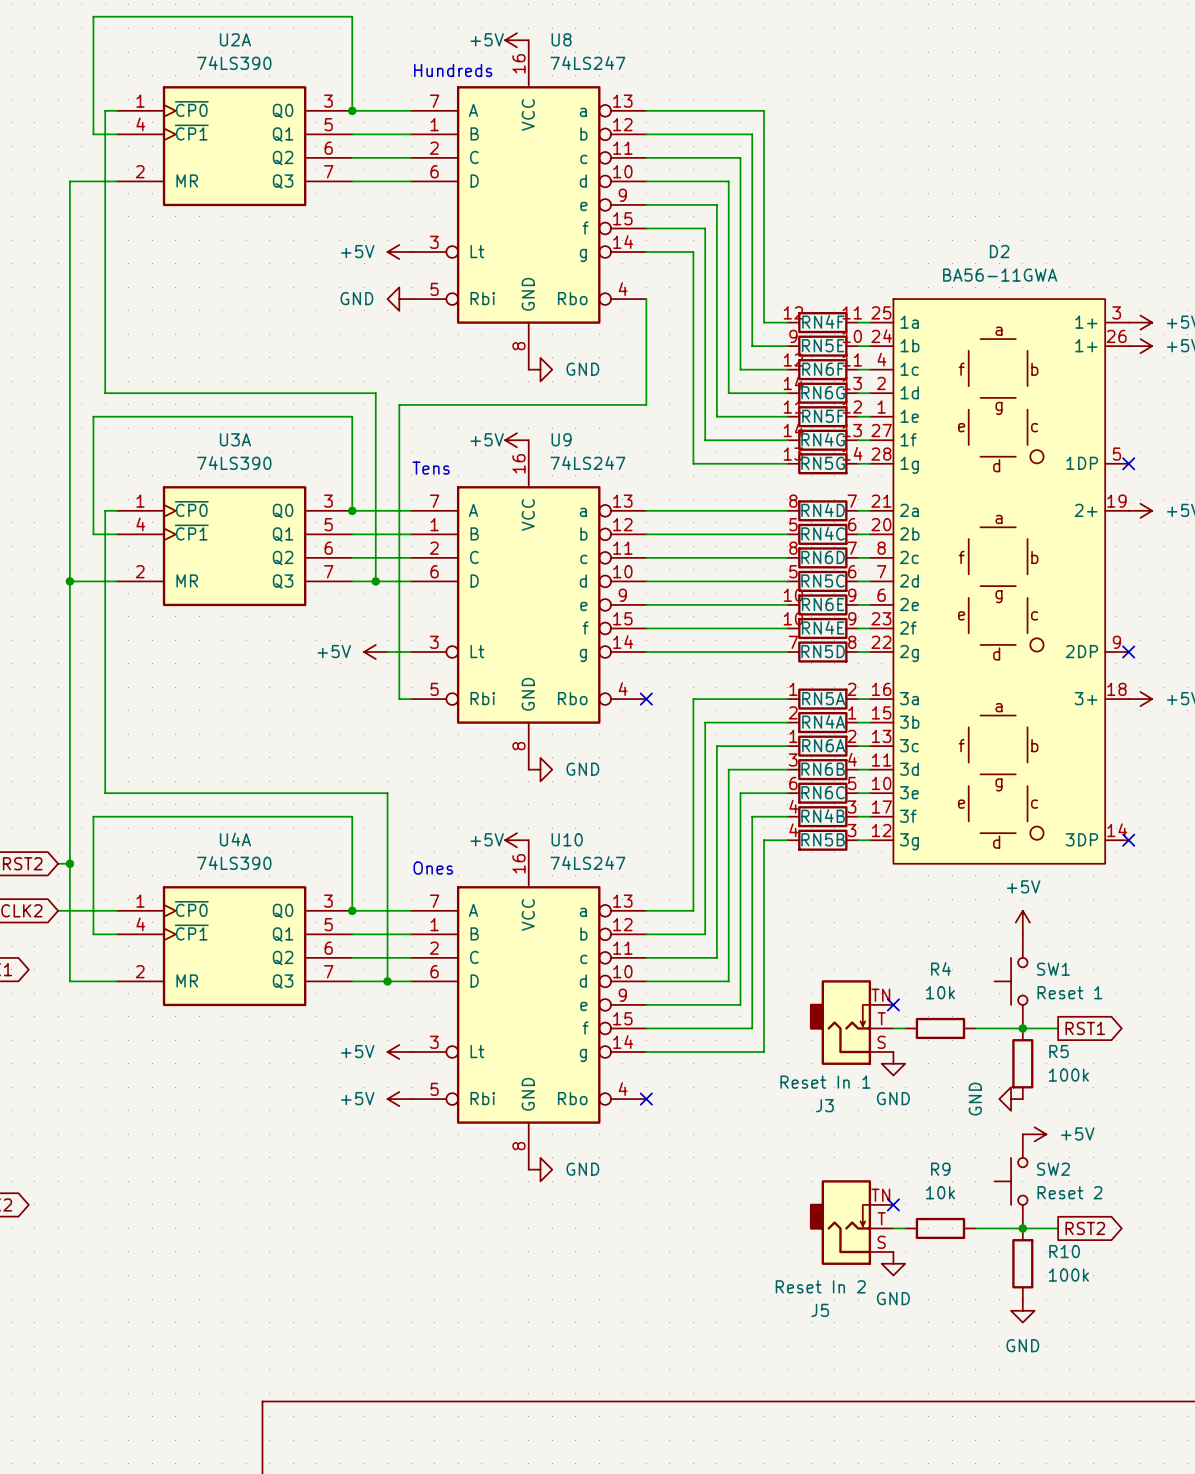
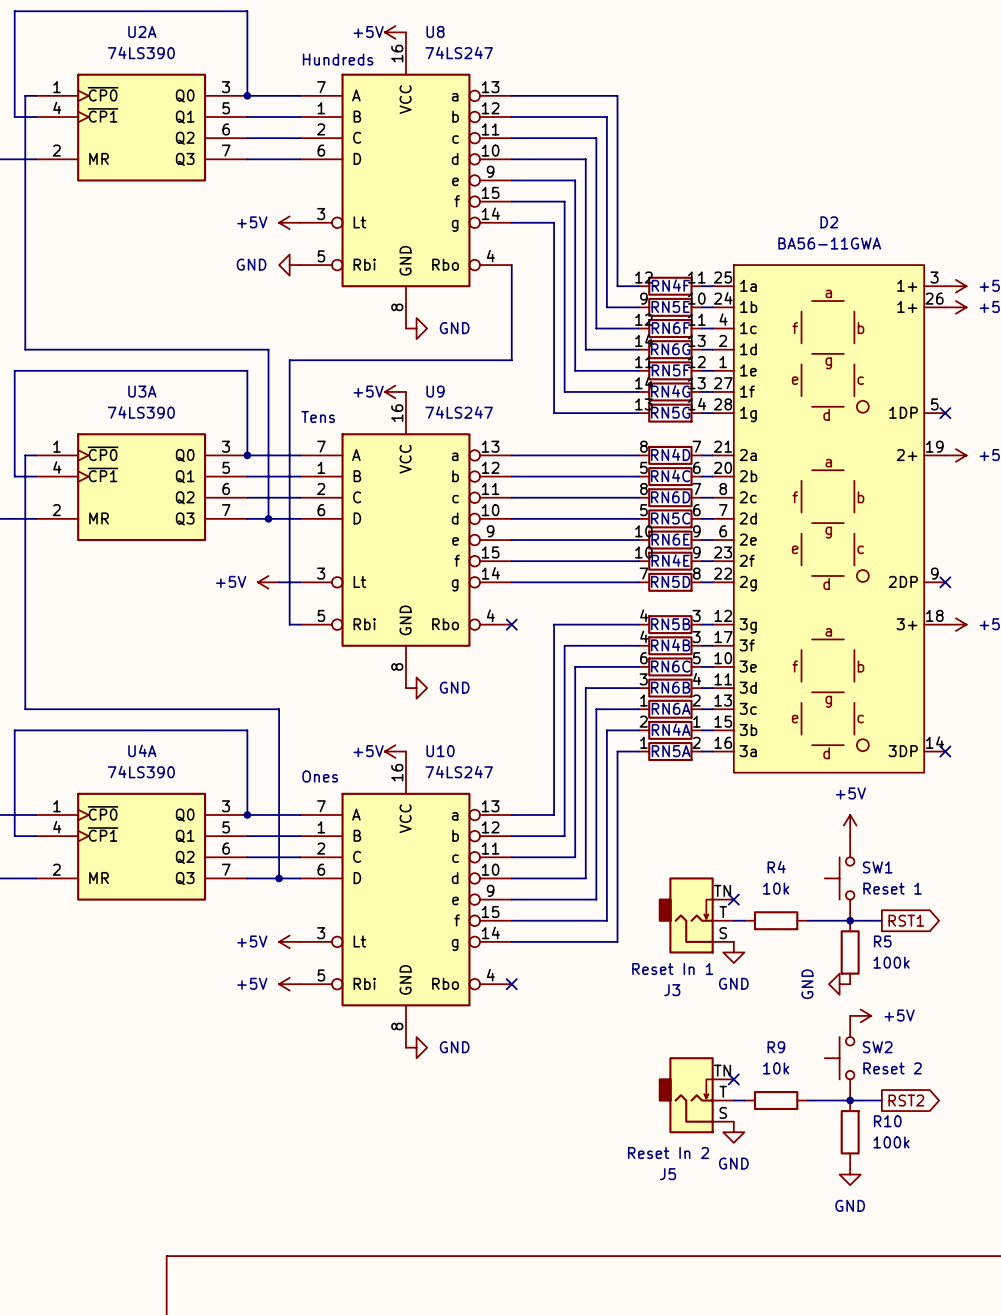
D2 symbol: [869, 299, 1129, 864] -> [712, 265, 946, 773]
RN5A position: (822, 699) -> (670, 751)
RN4A position: (822, 722) -> (670, 730)
RN6A position: (822, 746) -> (670, 709)
RN6C position: (822, 793) -> (670, 666)
RN4B position: (822, 816) -> (670, 645)
RN5B position: (822, 840) -> (670, 624)

